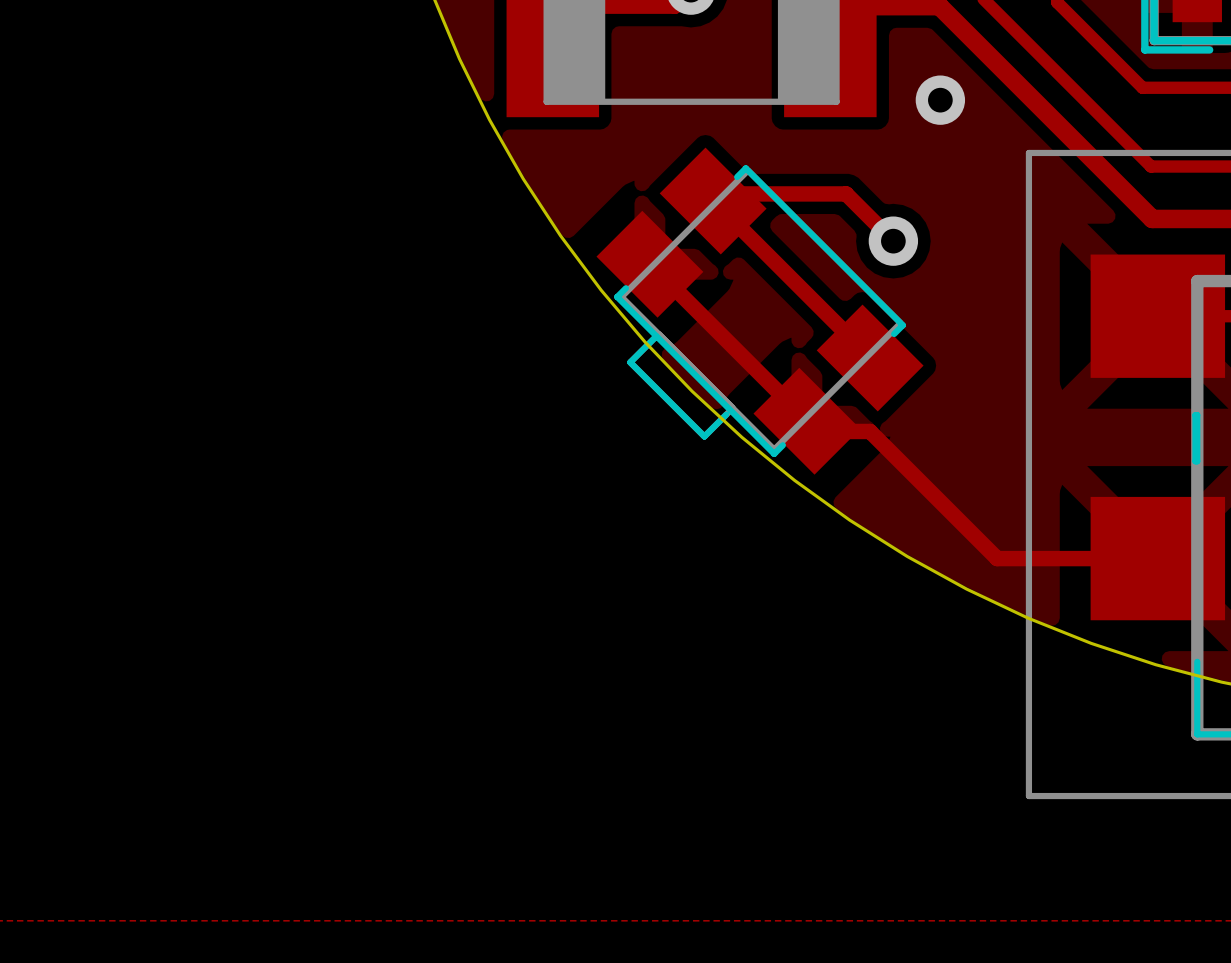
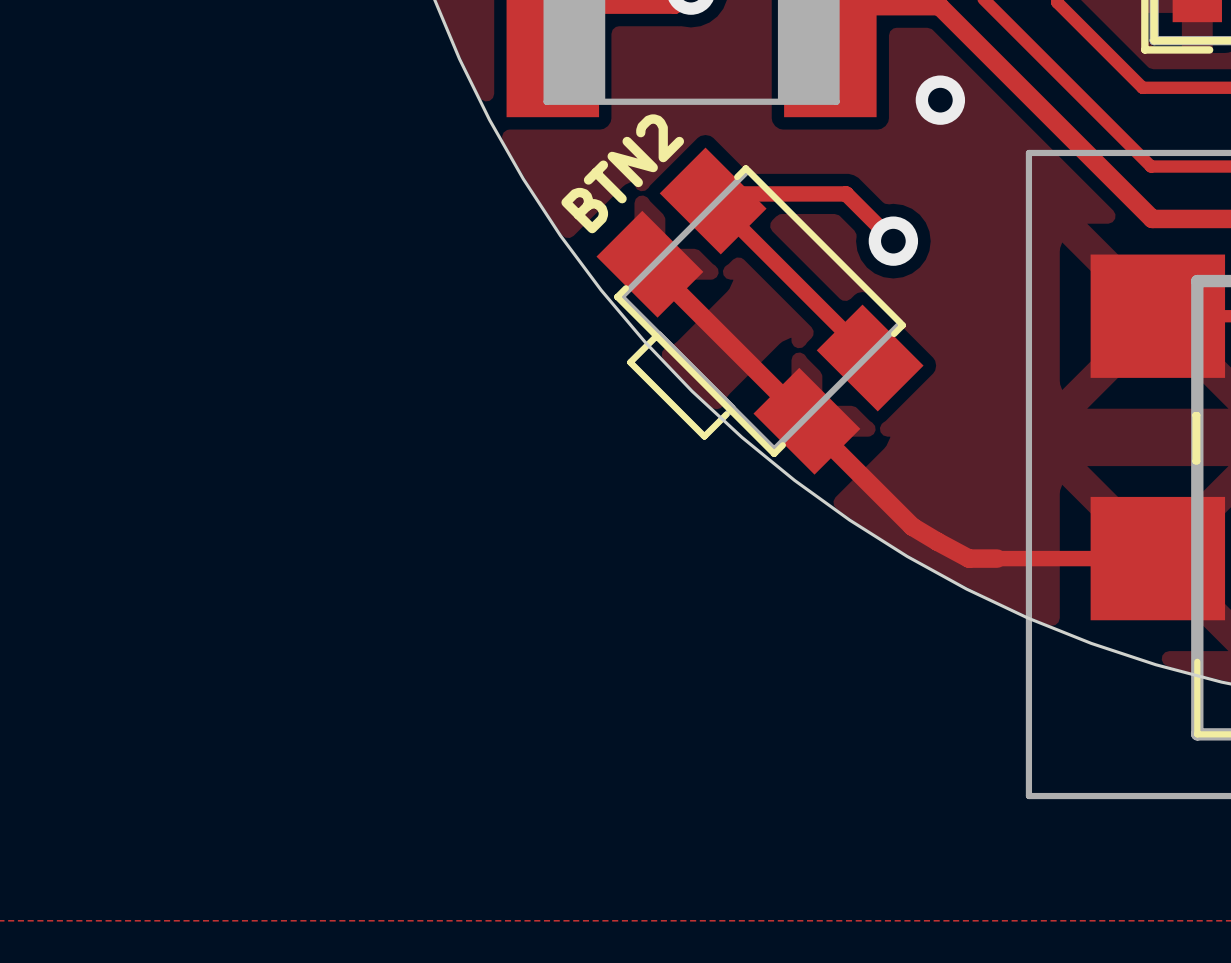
text: none -> BTN2 (622, 173)
track: (817, 431) (870, 431) (997, 558) -> (649, 264) (912, 526) (968, 558) (997, 558)

